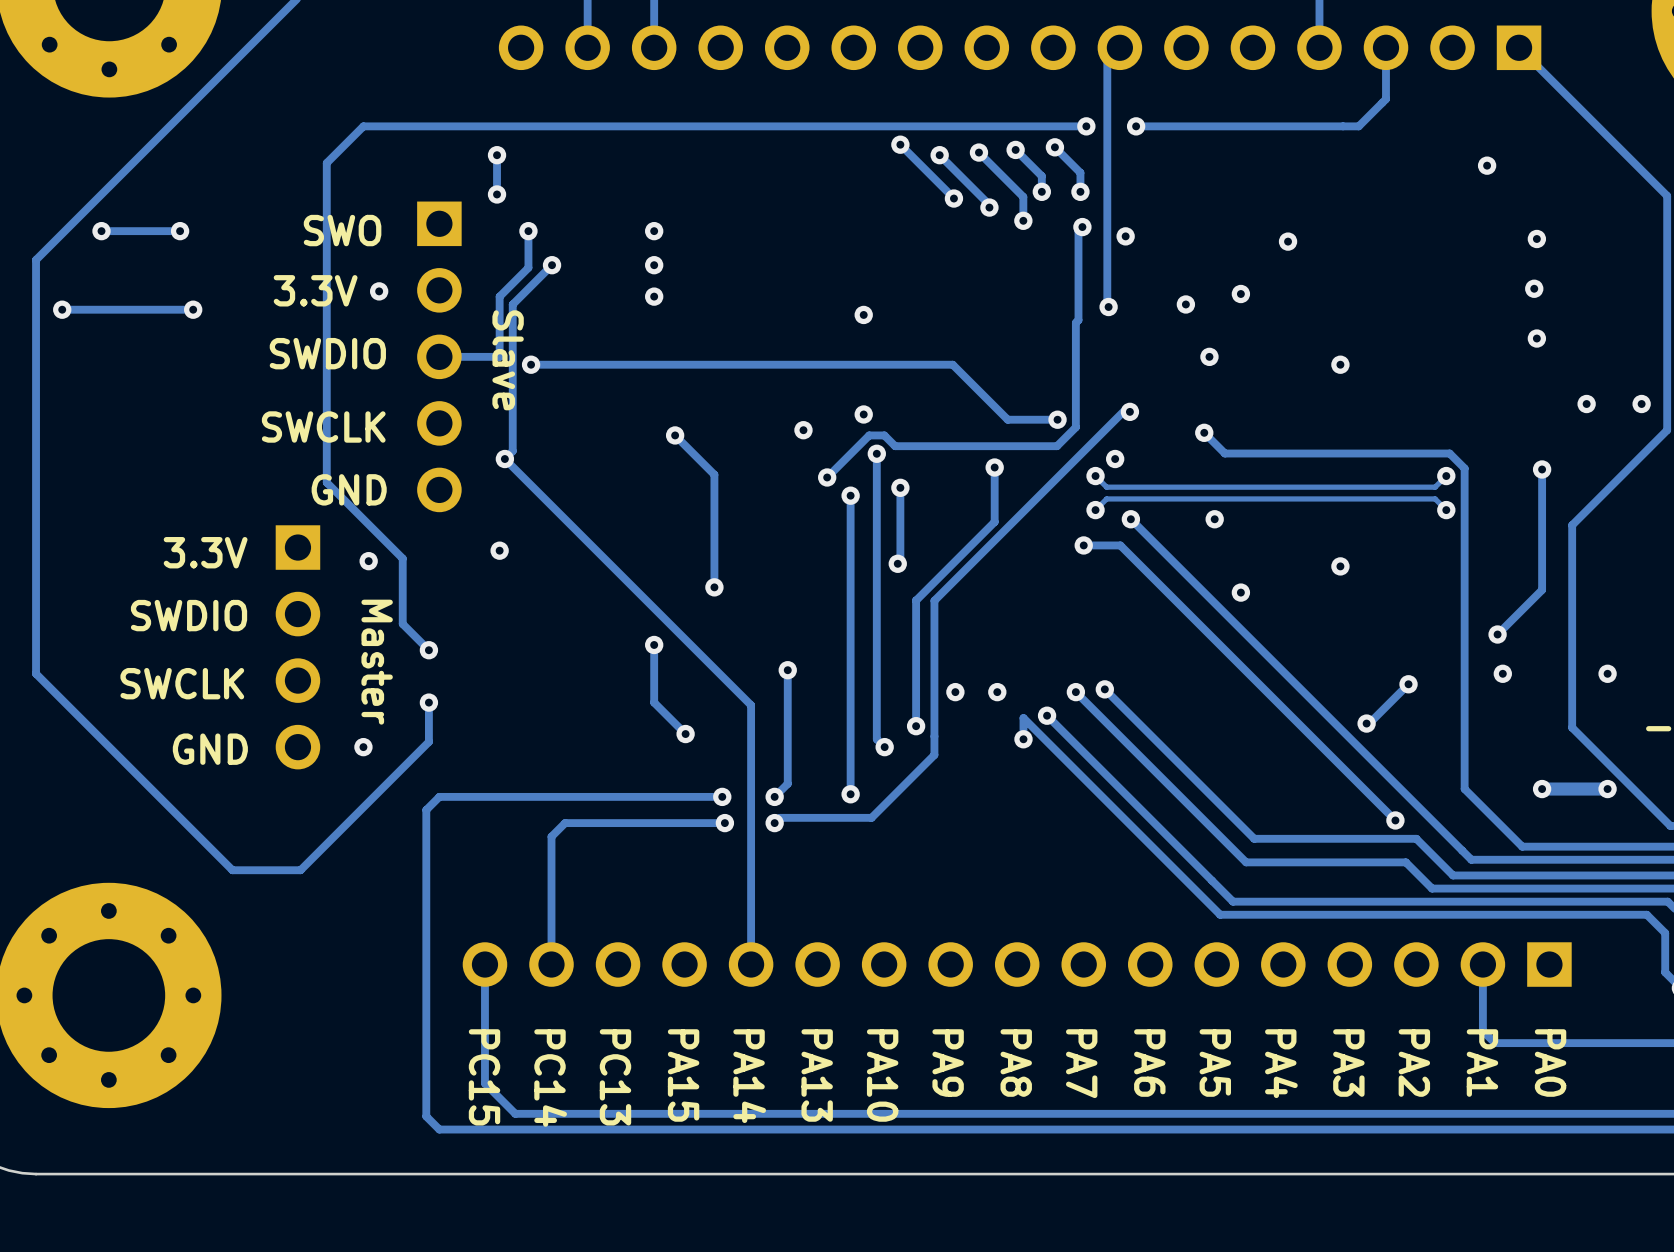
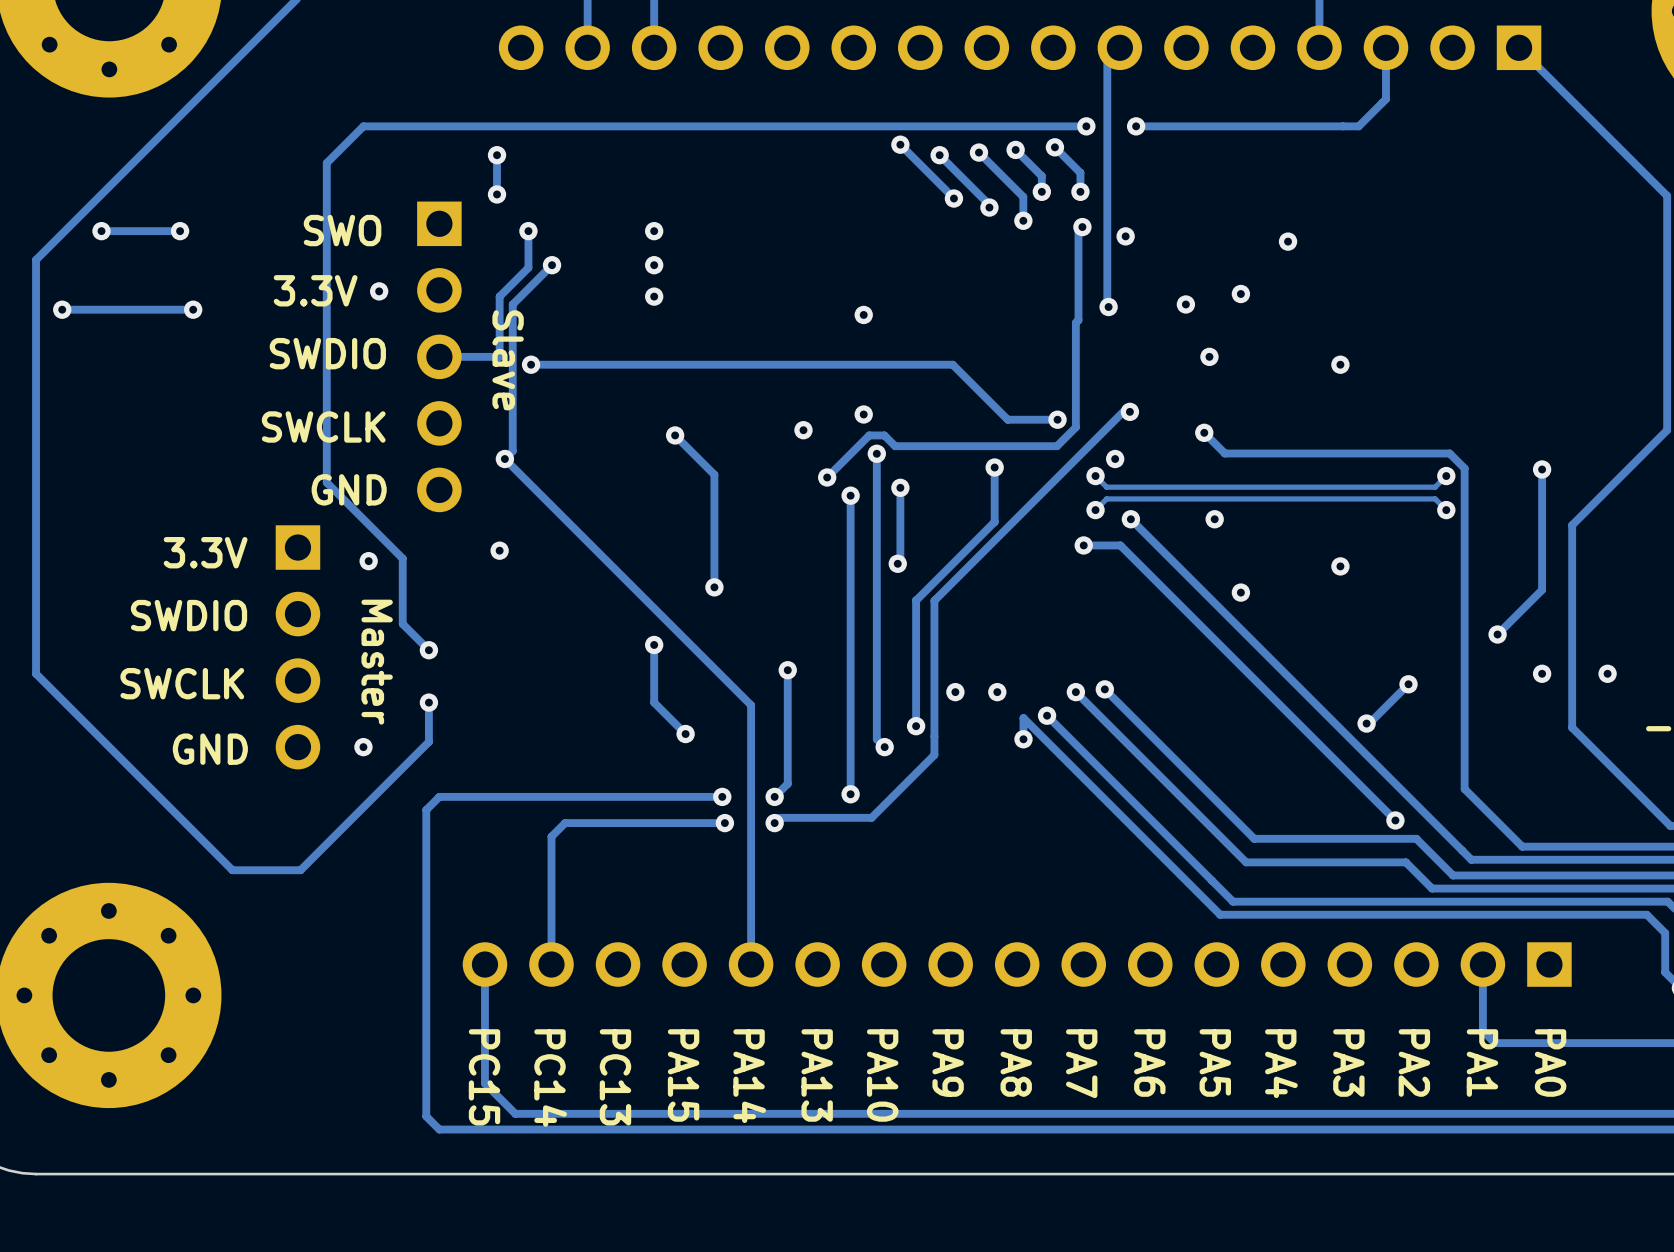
via: (1487, 165) -> none
via: (1536, 238) -> none
via: (1534, 288) -> none
via: (1536, 338) -> none
via: (1586, 404) -> none
via: (1641, 404) -> none
via position: (1502, 673) -> (1542, 673)
via: (1542, 789) -> none
track: (1607, 789) (1542, 789) -> none
via: (1607, 789) -> none

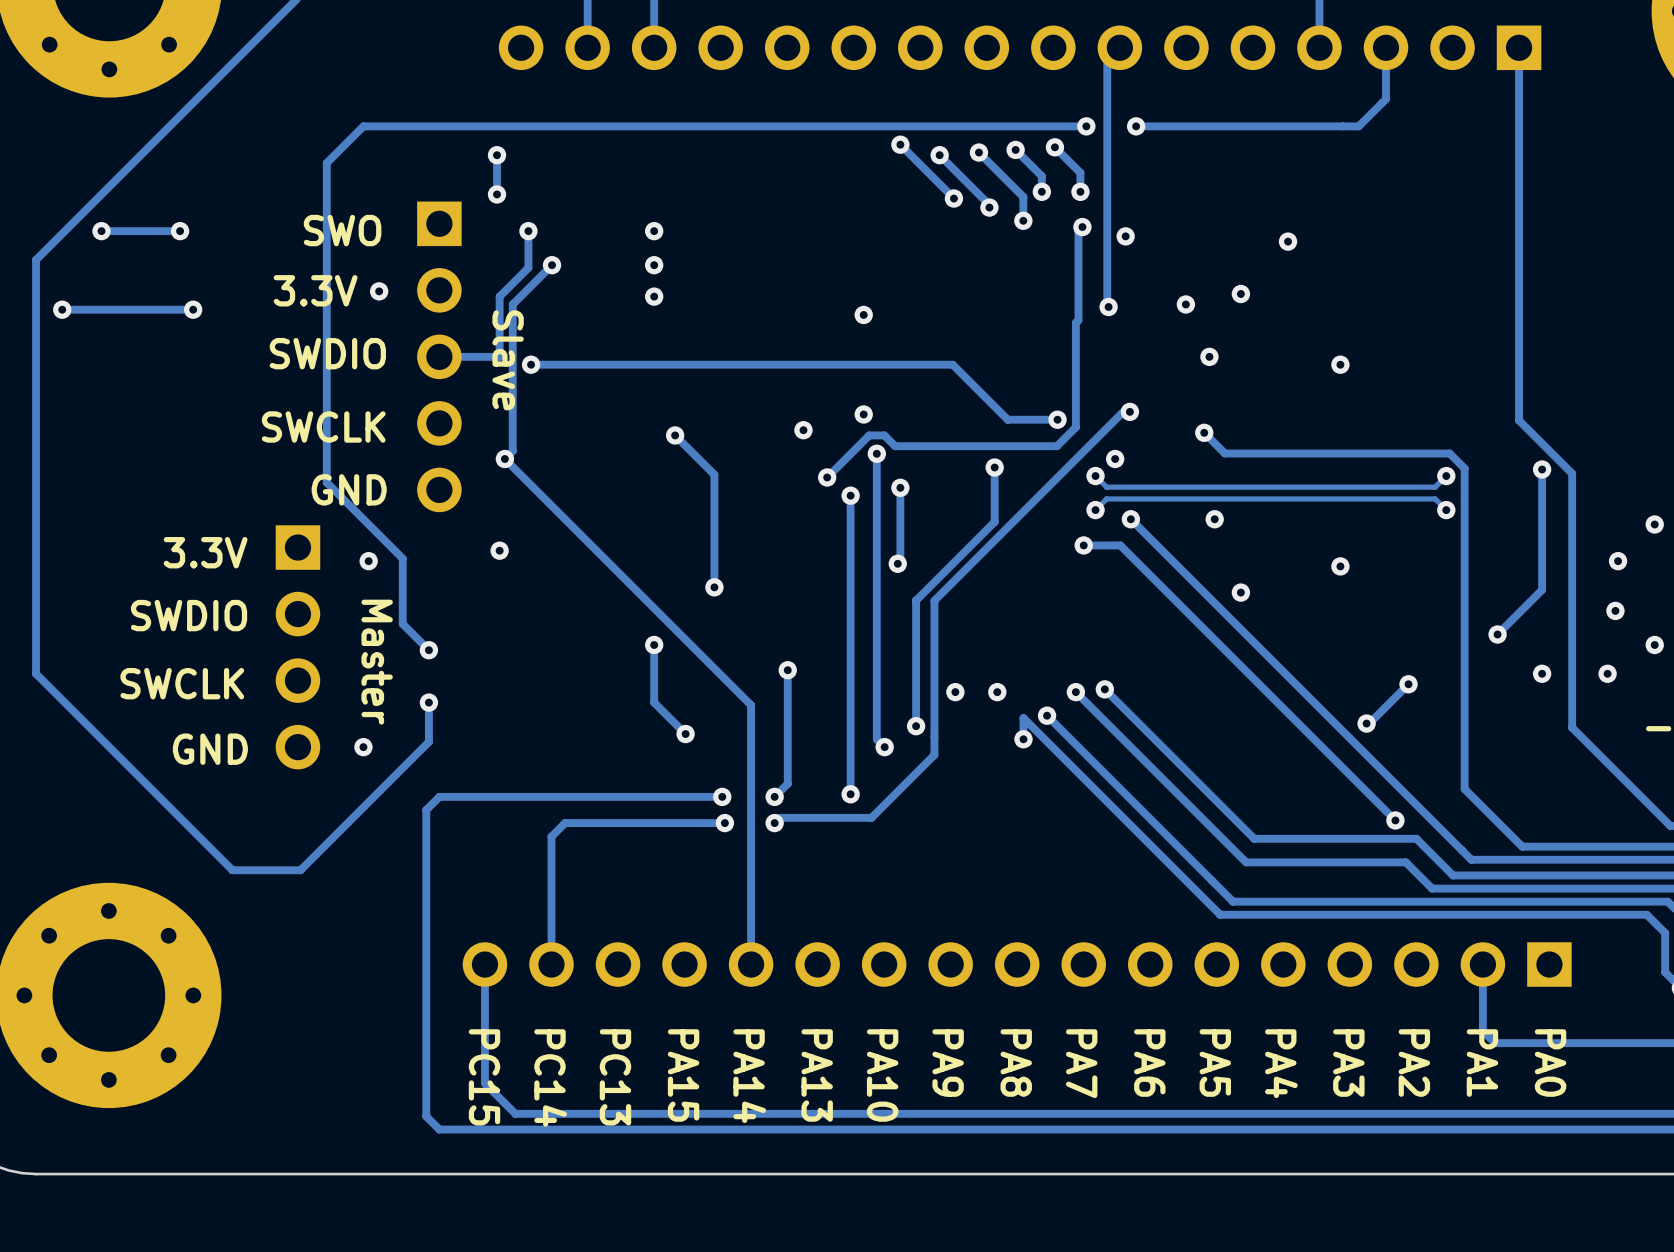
track: (1519, 47) (1667, 195) (1667, 430) (1572, 525) -> (1519, 47) (1519, 420) (1572, 473) (1572, 525)
via: none -> (1654, 524)
via: none -> (1618, 561)
via: none -> (1615, 610)
via: none -> (1654, 644)

